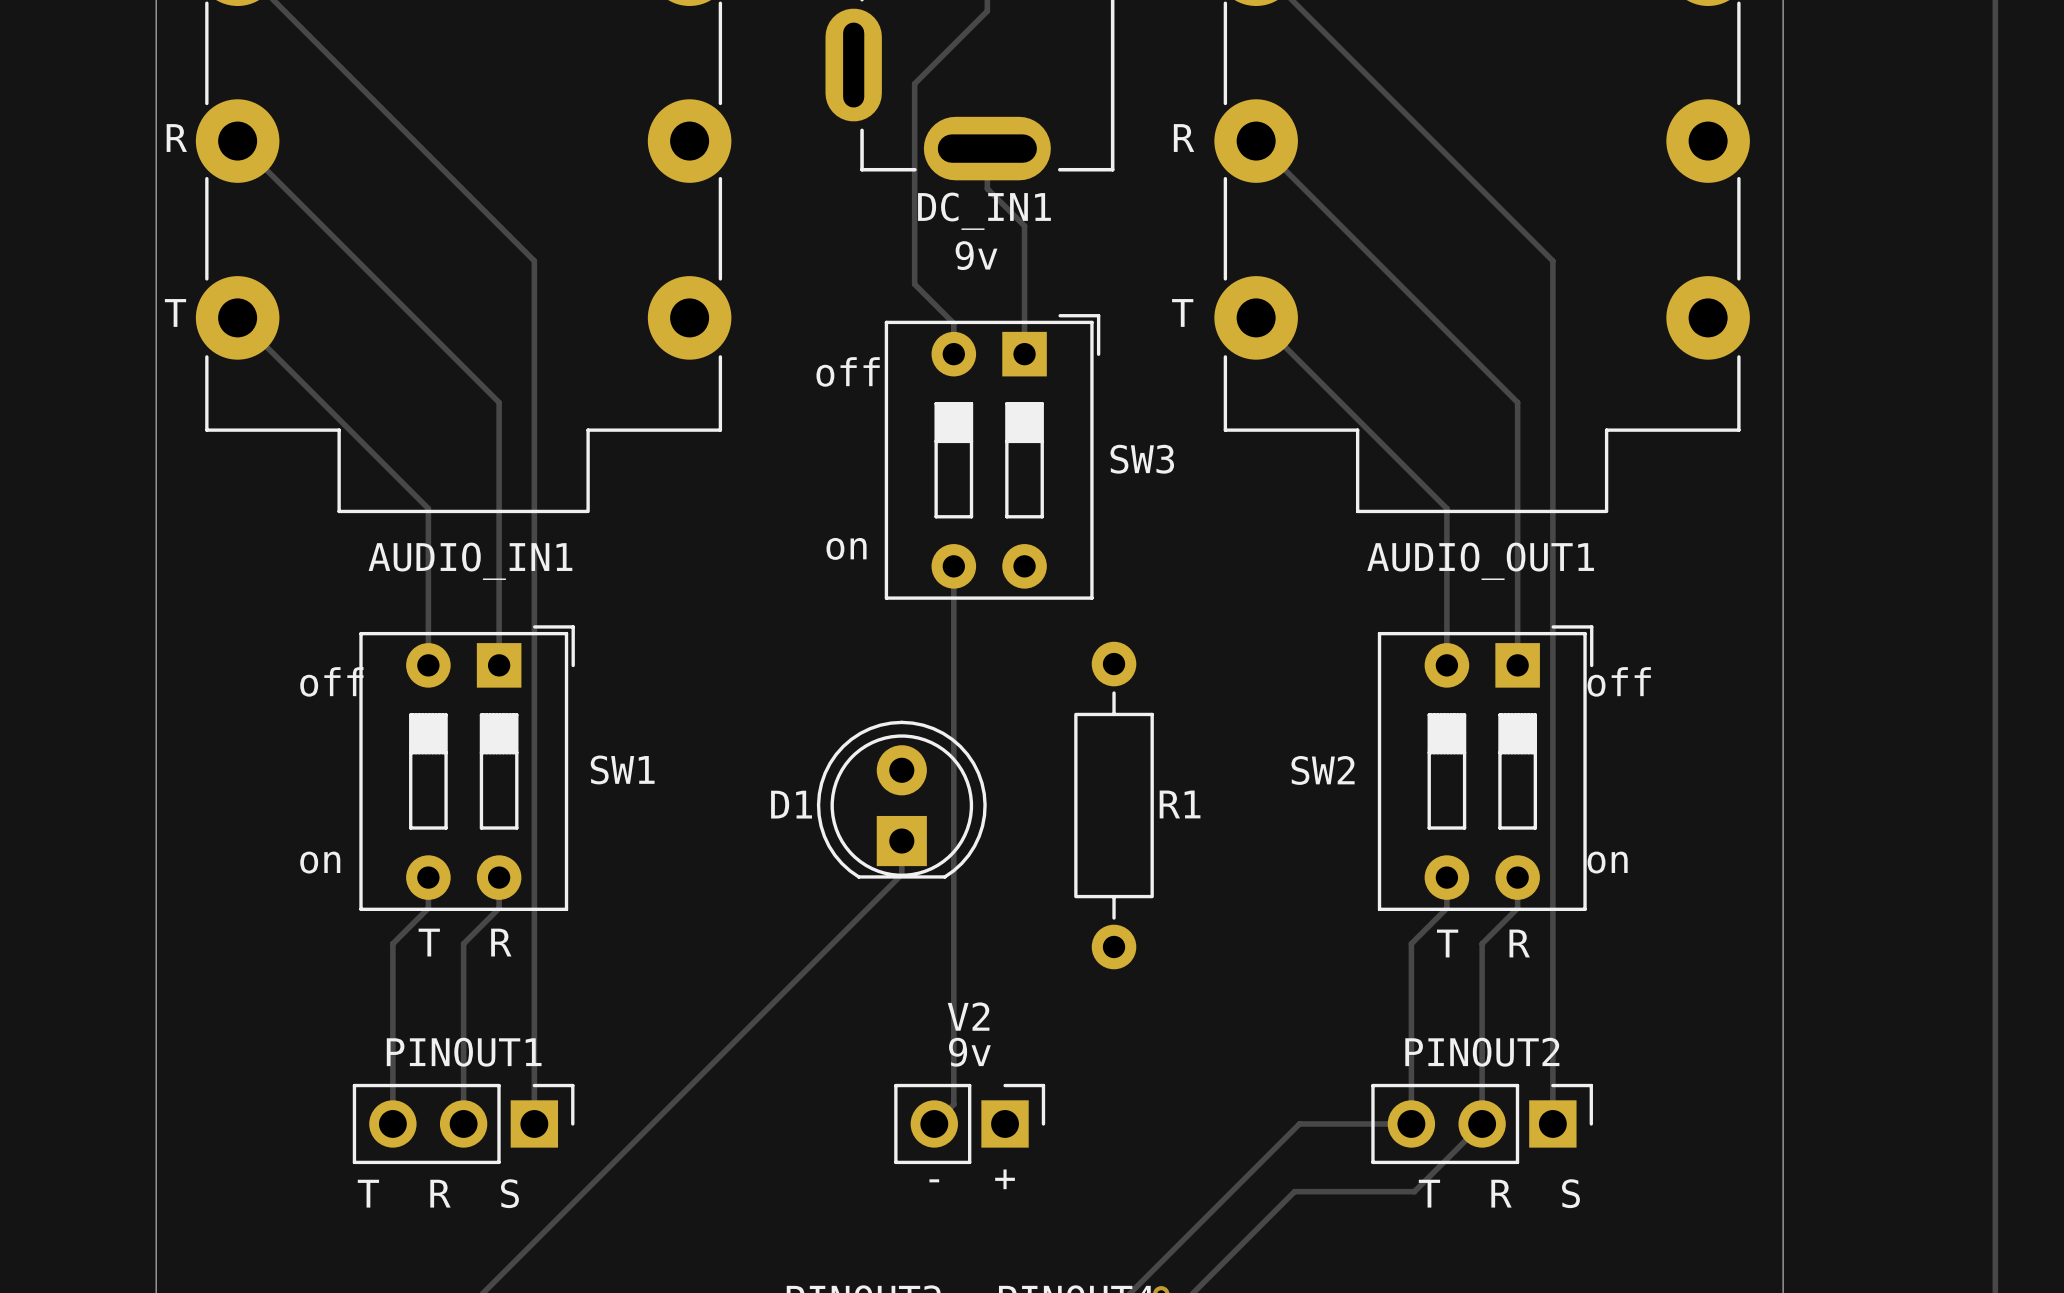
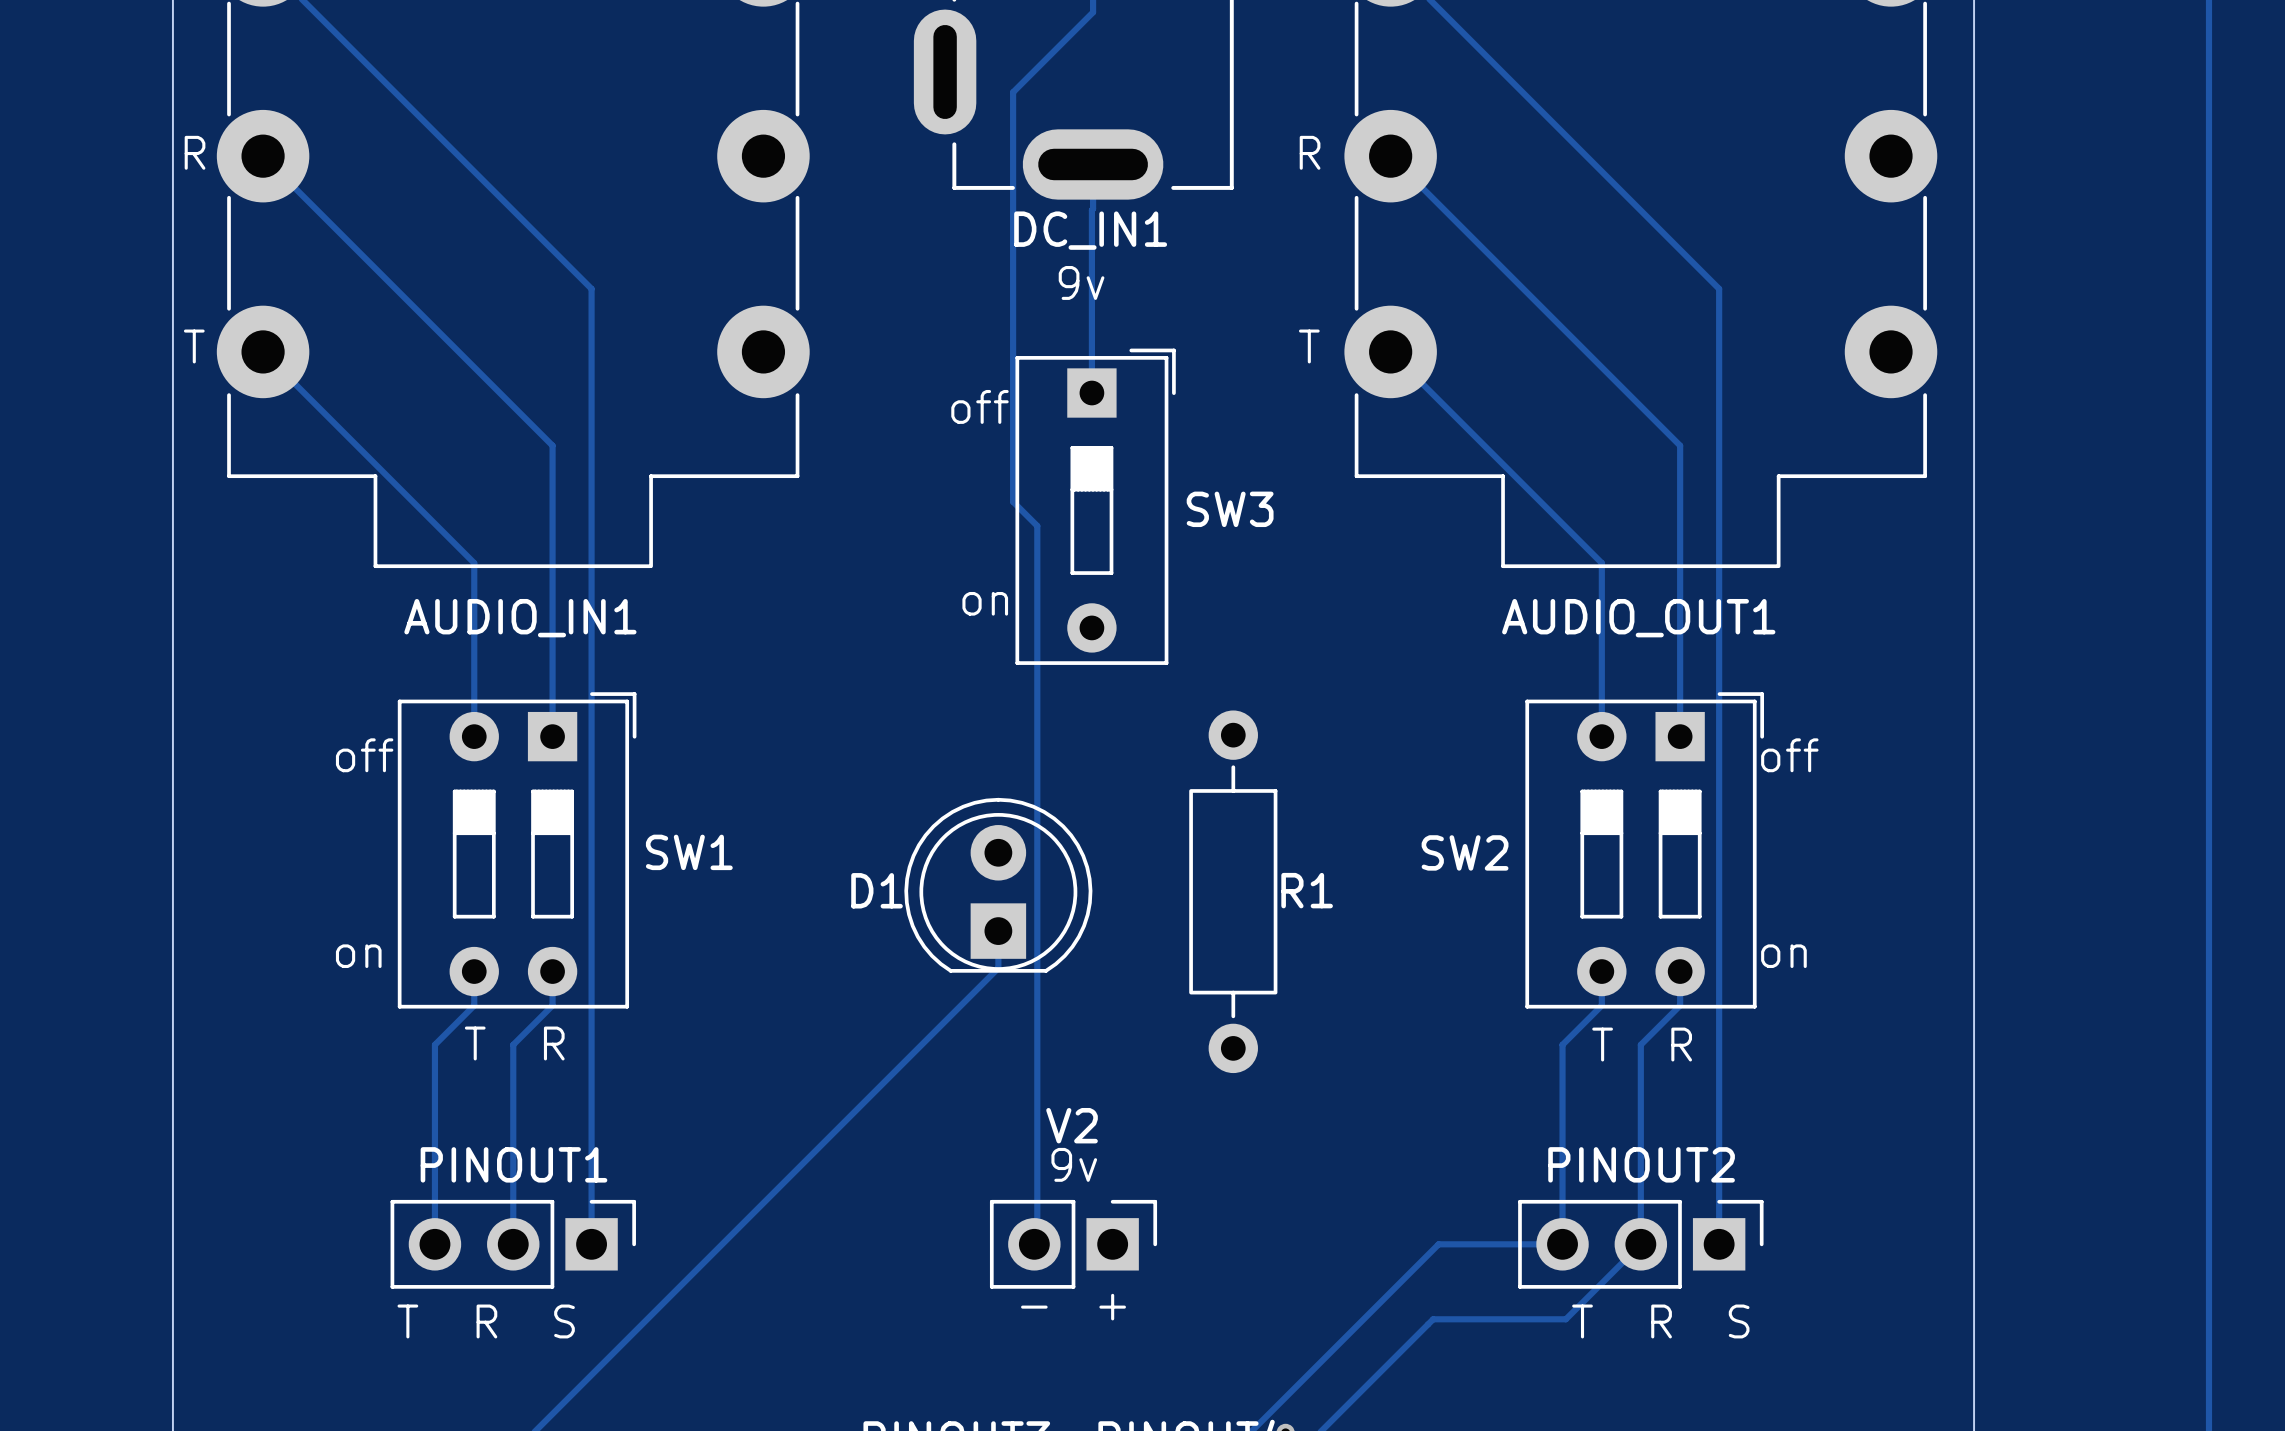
track: (915, 83) (914, 284) (953, 323) (953, 354) -> none
track: (987, 188) (1024, 225) (1024, 354) -> (1093, 208) (1091, 393)
SW3 footprint: [884, 314, 1101, 600] -> [1015, 348, 1176, 665]
text position: off (848, 371) -> off (979, 406)
text position: on (846, 548) -> on (985, 603)
track: (953, 566) (953, 1104) (936, 1121) -> (1013, 92) (1013, 501) (1037, 525) (1037, 1241)

